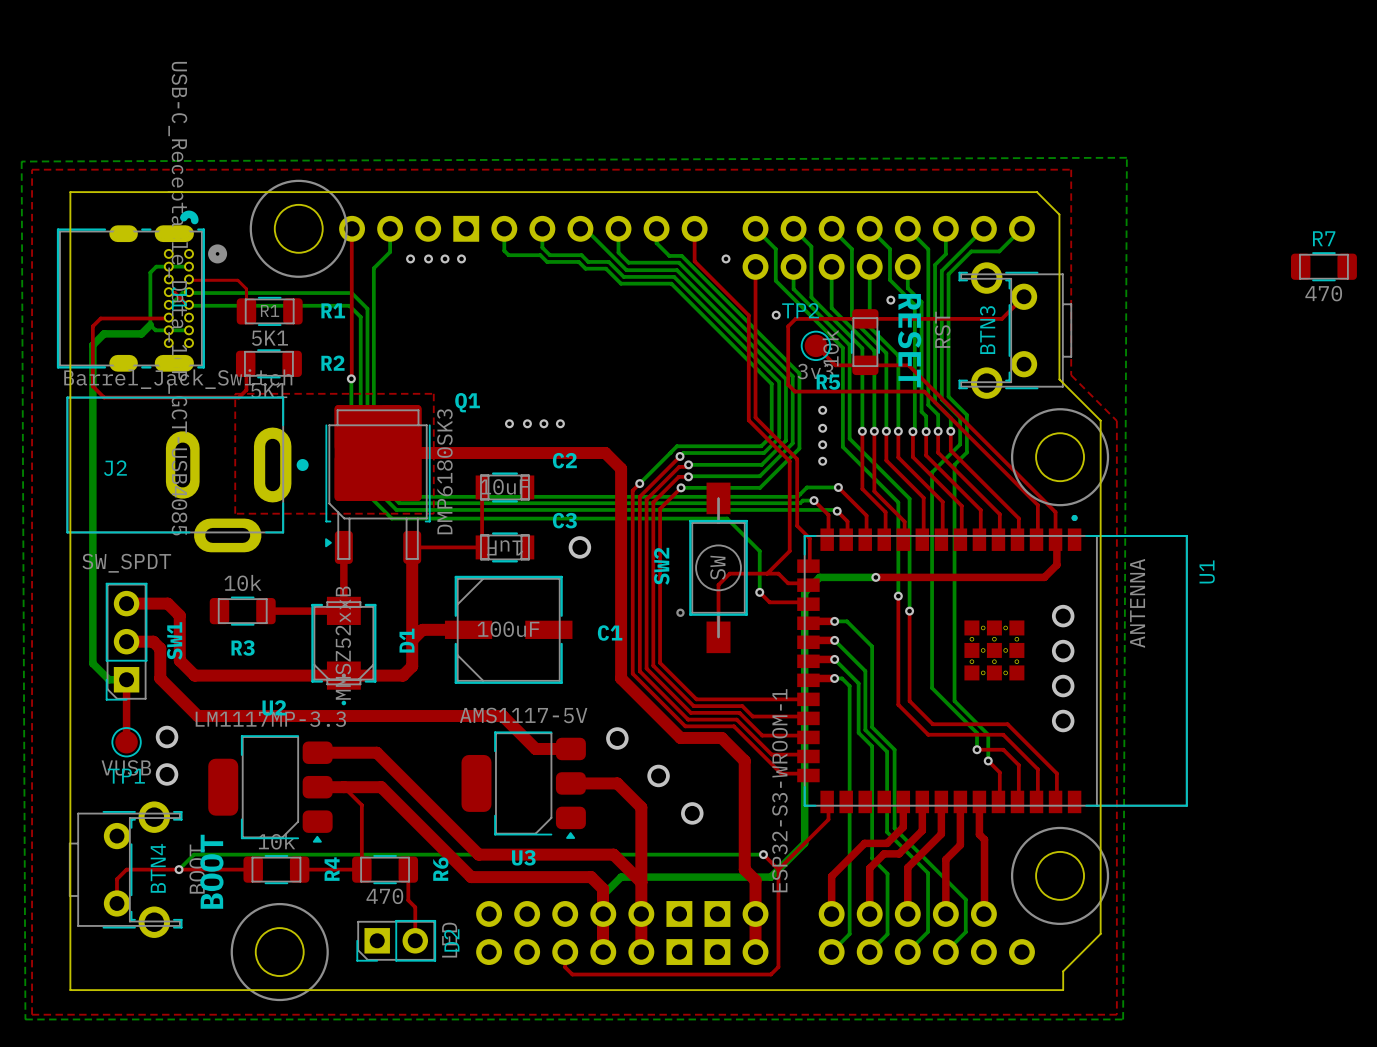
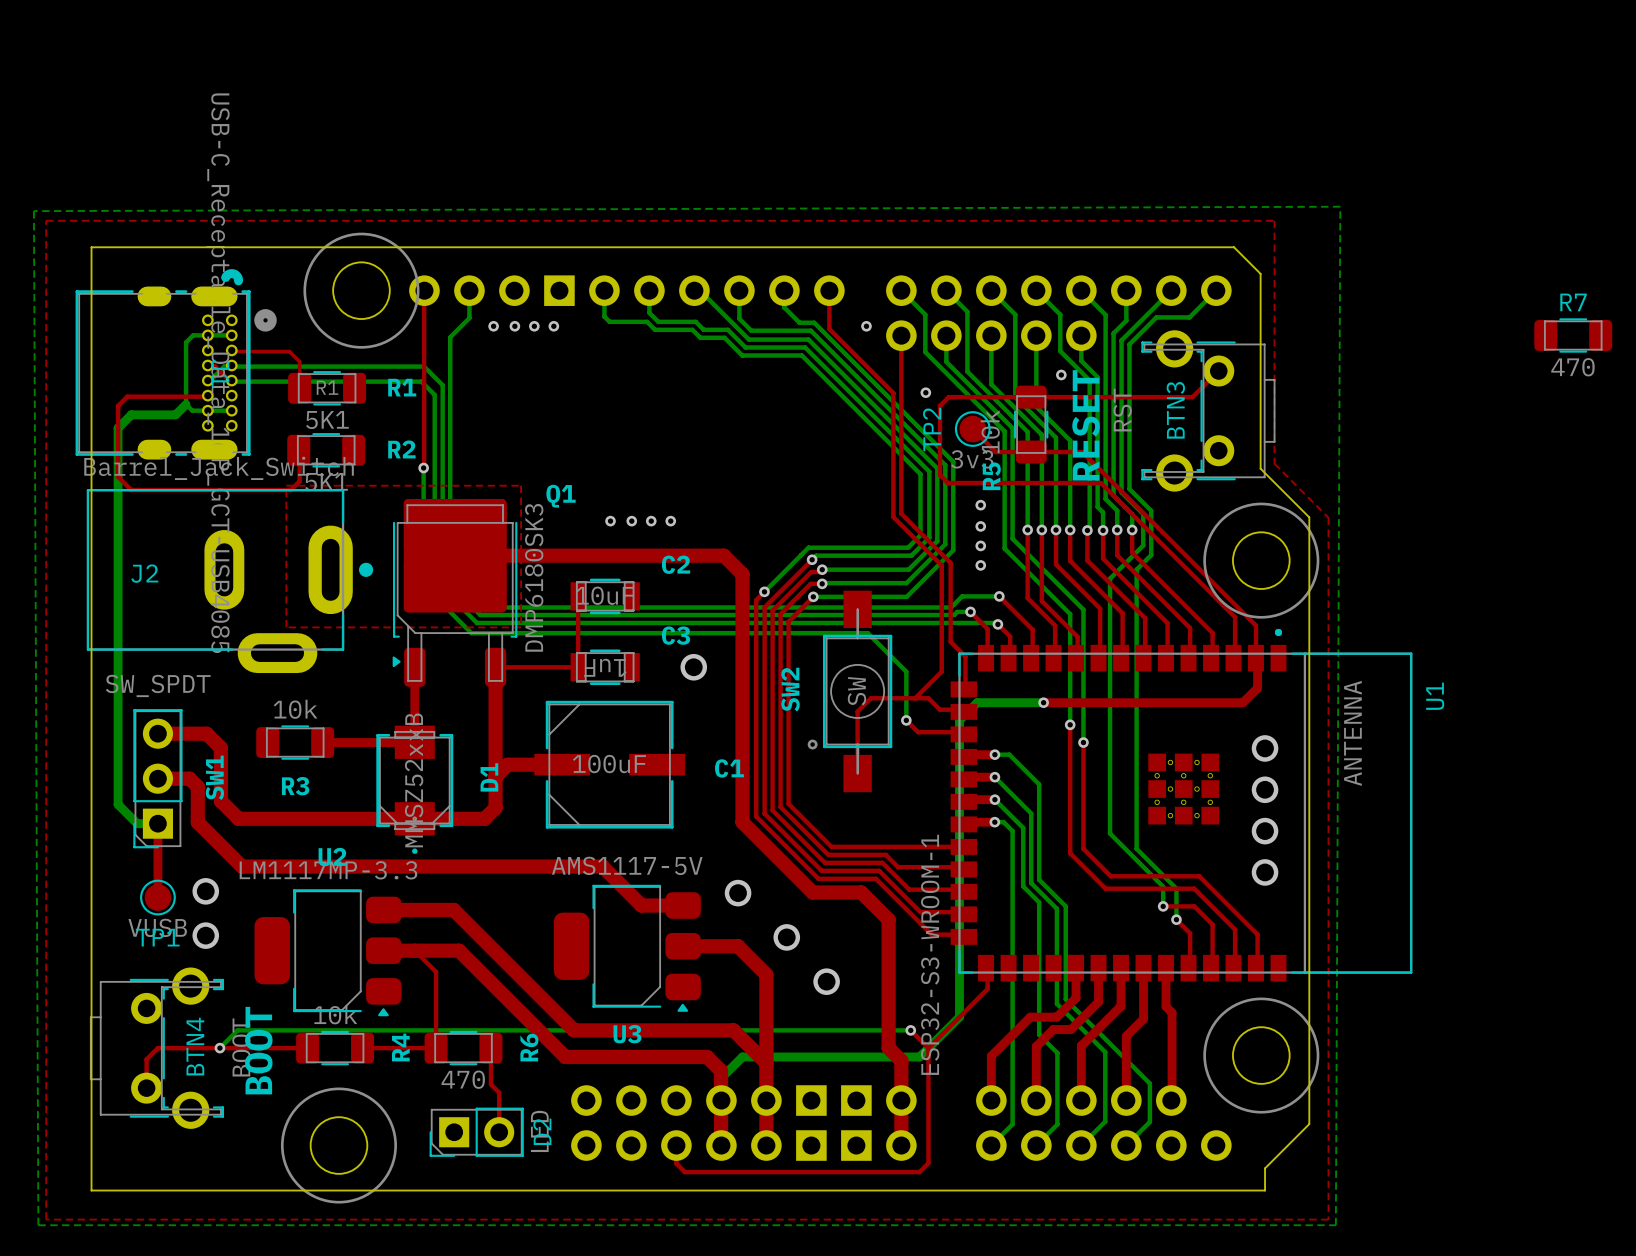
TP2 name rotation: 0° (800, 310) -> 90° counterclockwise (932, 429)
text rotation: 0° (909, 340) -> 180° (1086, 425)
R5 name rotation: 0° (828, 382) -> 90° counterclockwise (991, 476)

